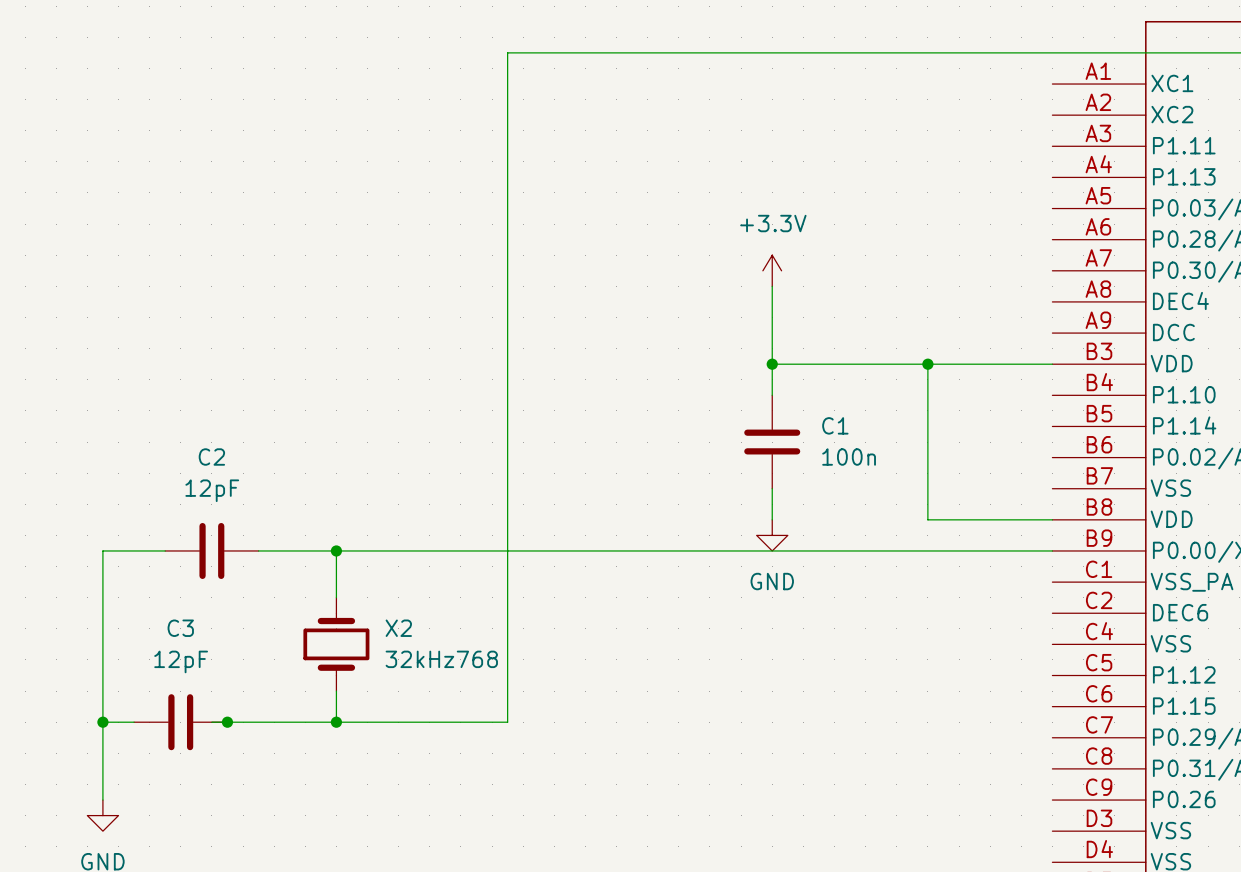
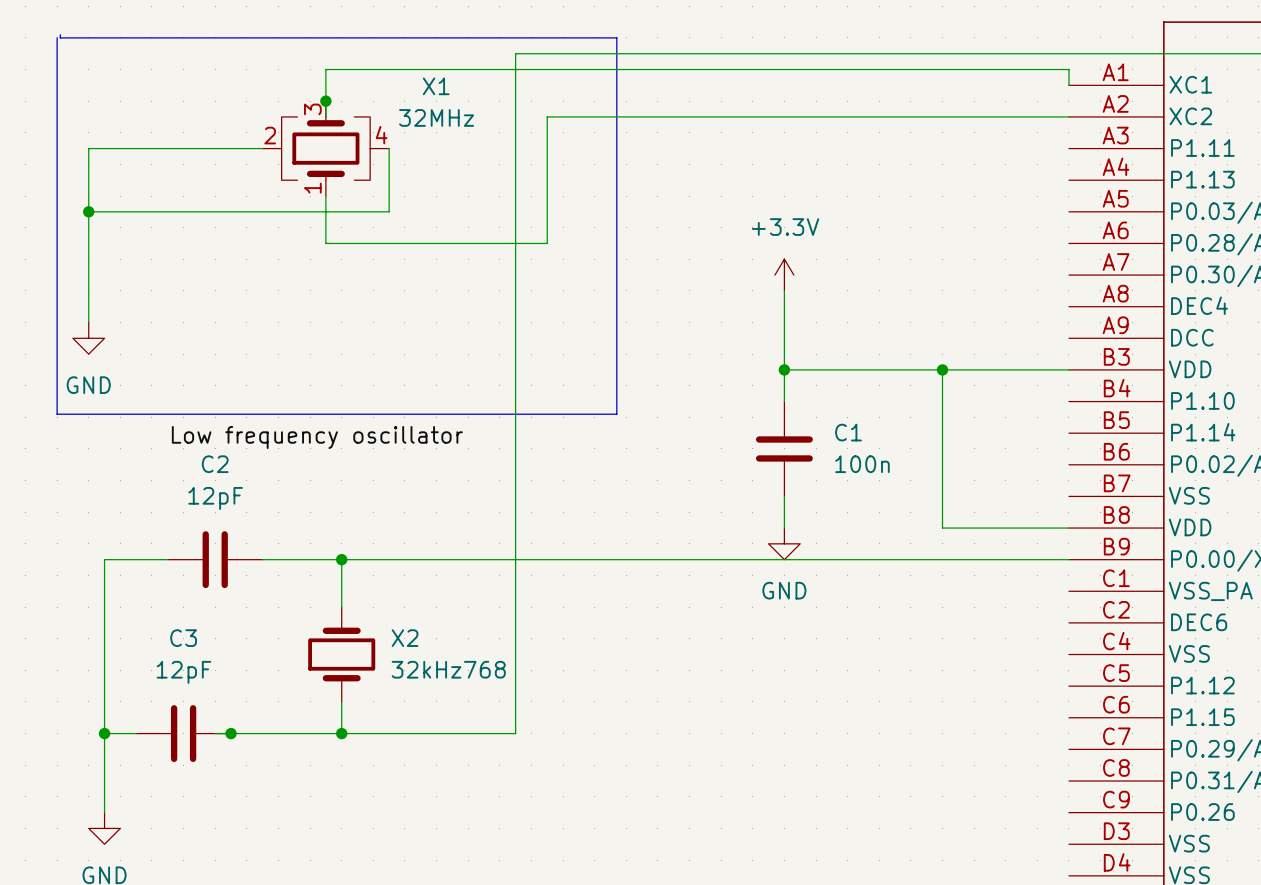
line: none -> (60, 34) (60, 37) (616, 37) (616, 414) (57, 414) (57, 37)
wire: none -> (1068, 85) (1068, 69) (325, 69) (325, 116)
junction: none -> (325, 101)
wire: none -> (1068, 116) (547, 116) (547, 243) (325, 243) (325, 196)
wire: none -> (262, 148) (88, 148) (88, 322)
X1: none -> 32MHz (325, 148)
wire: none -> (389, 148) (389, 211) (88, 211)
junction: none -> (88, 211)
power symbol: none -> GND (88, 338)
label: none -> Low frequency oscillator (317, 437)

